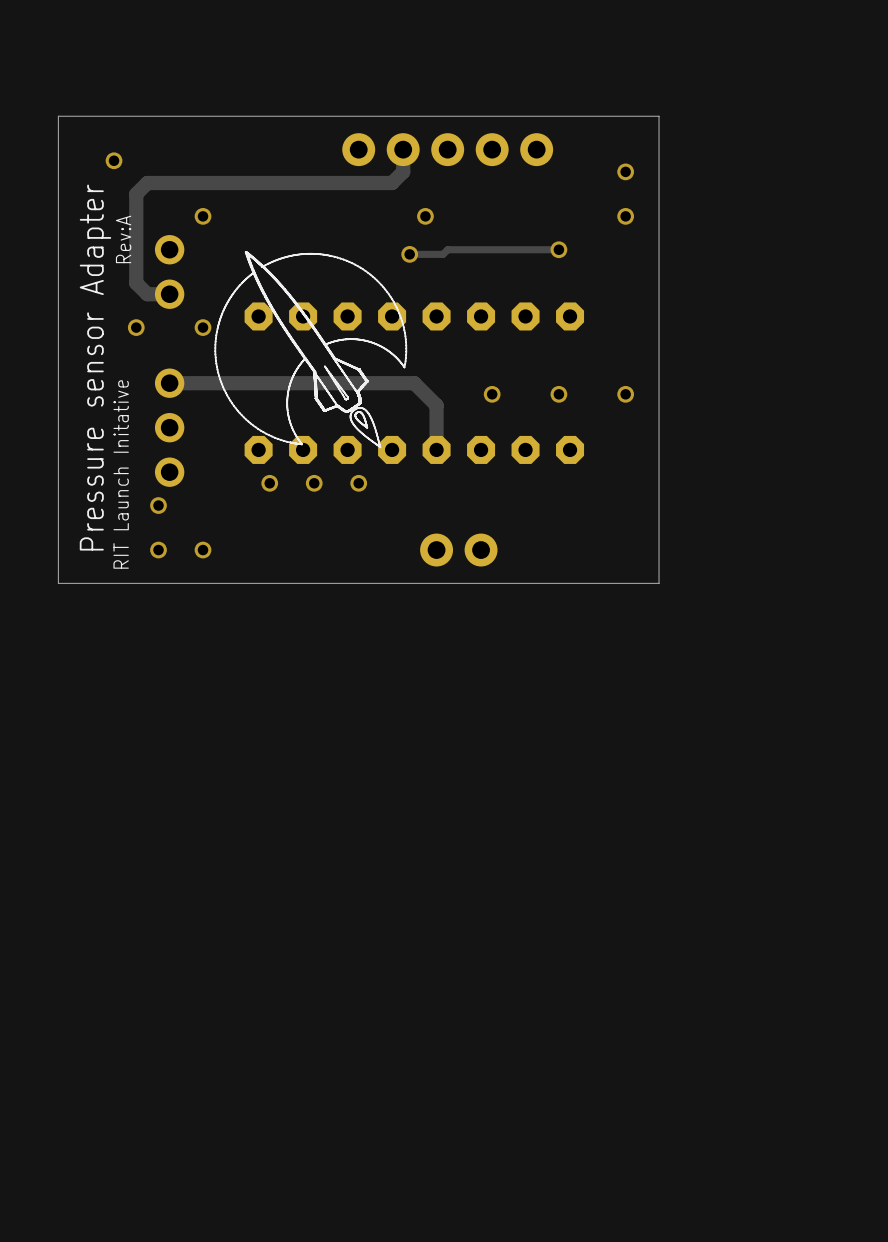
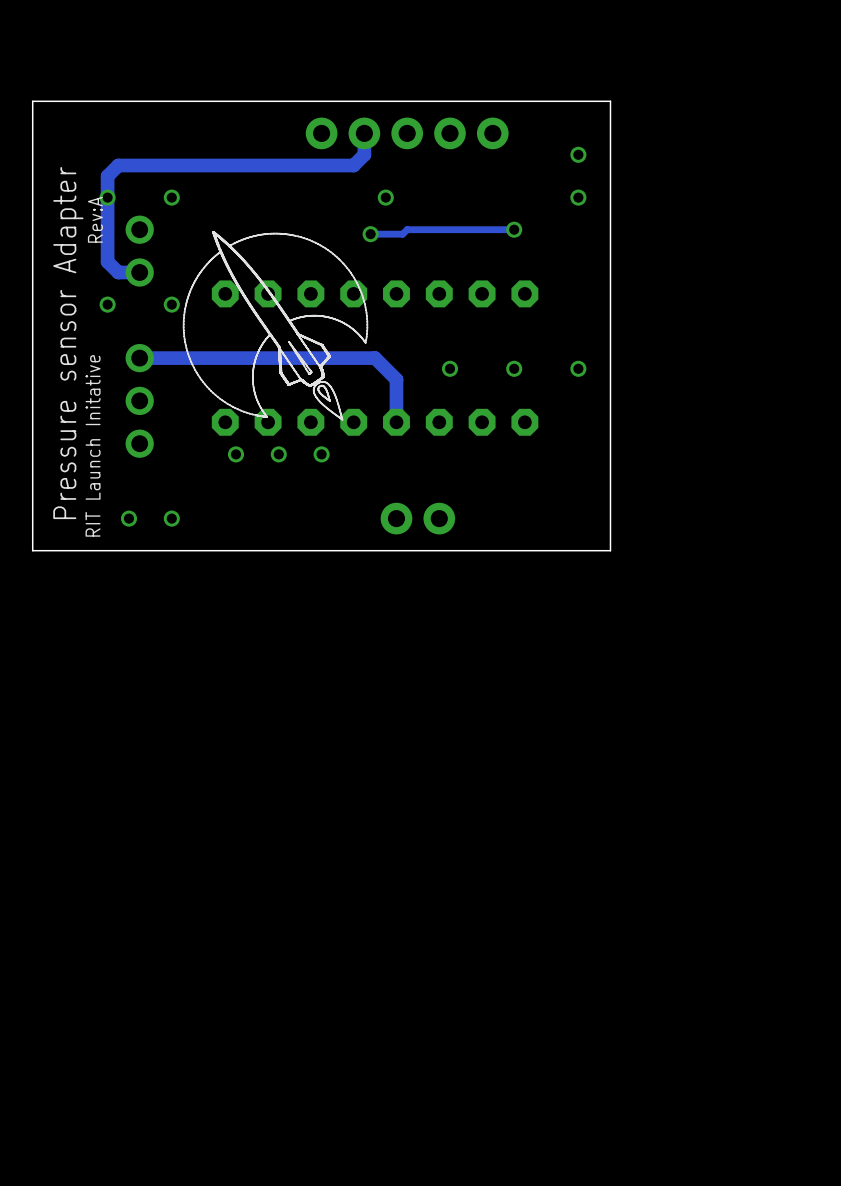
via position: (114, 160) -> (107, 197)
via: (158, 505) -> none

